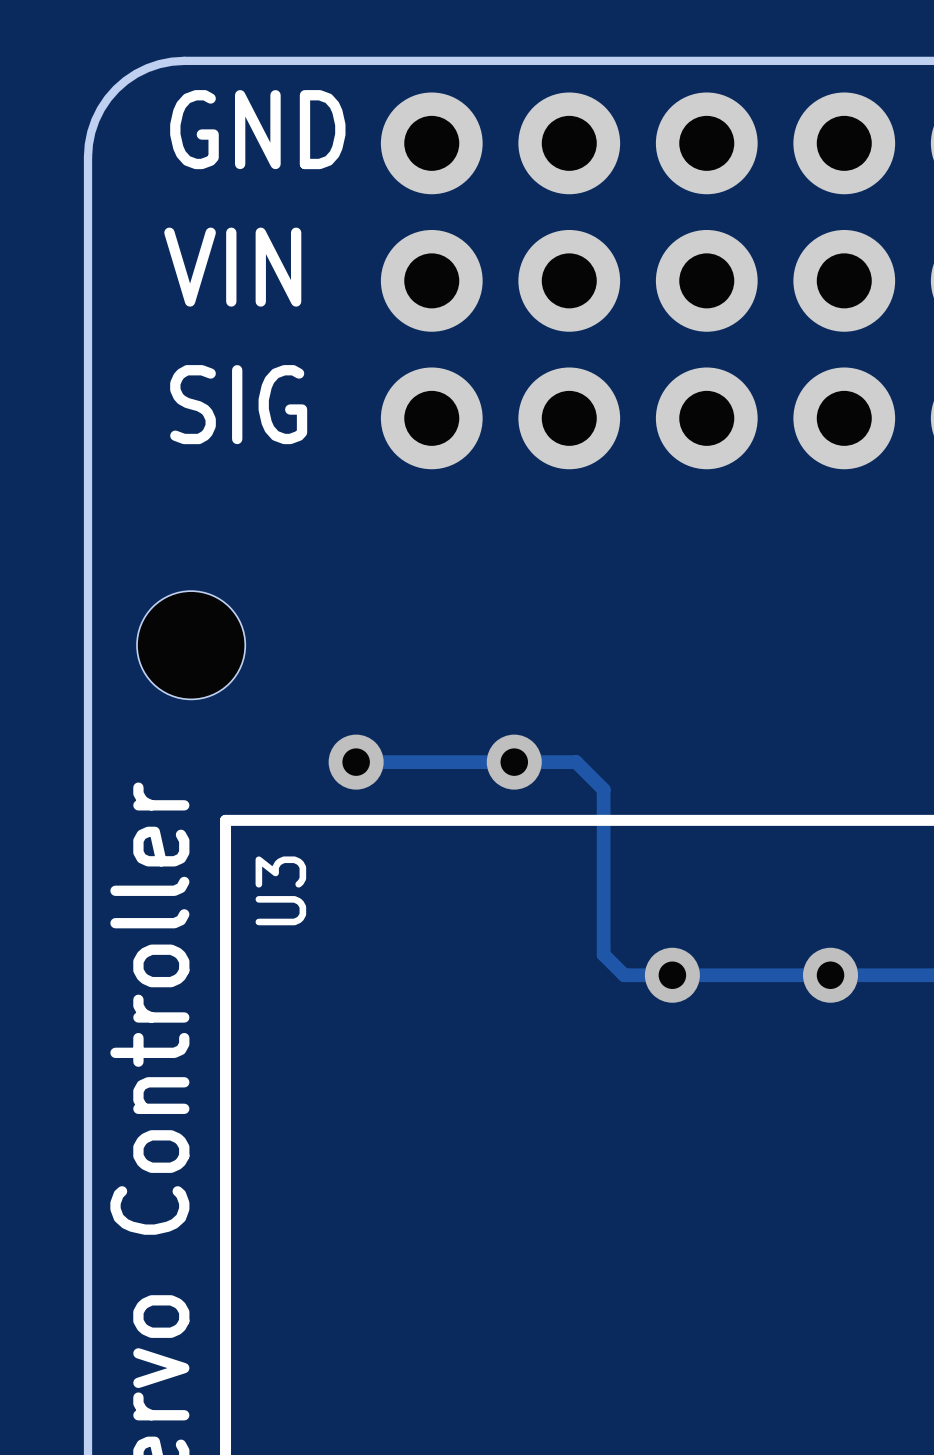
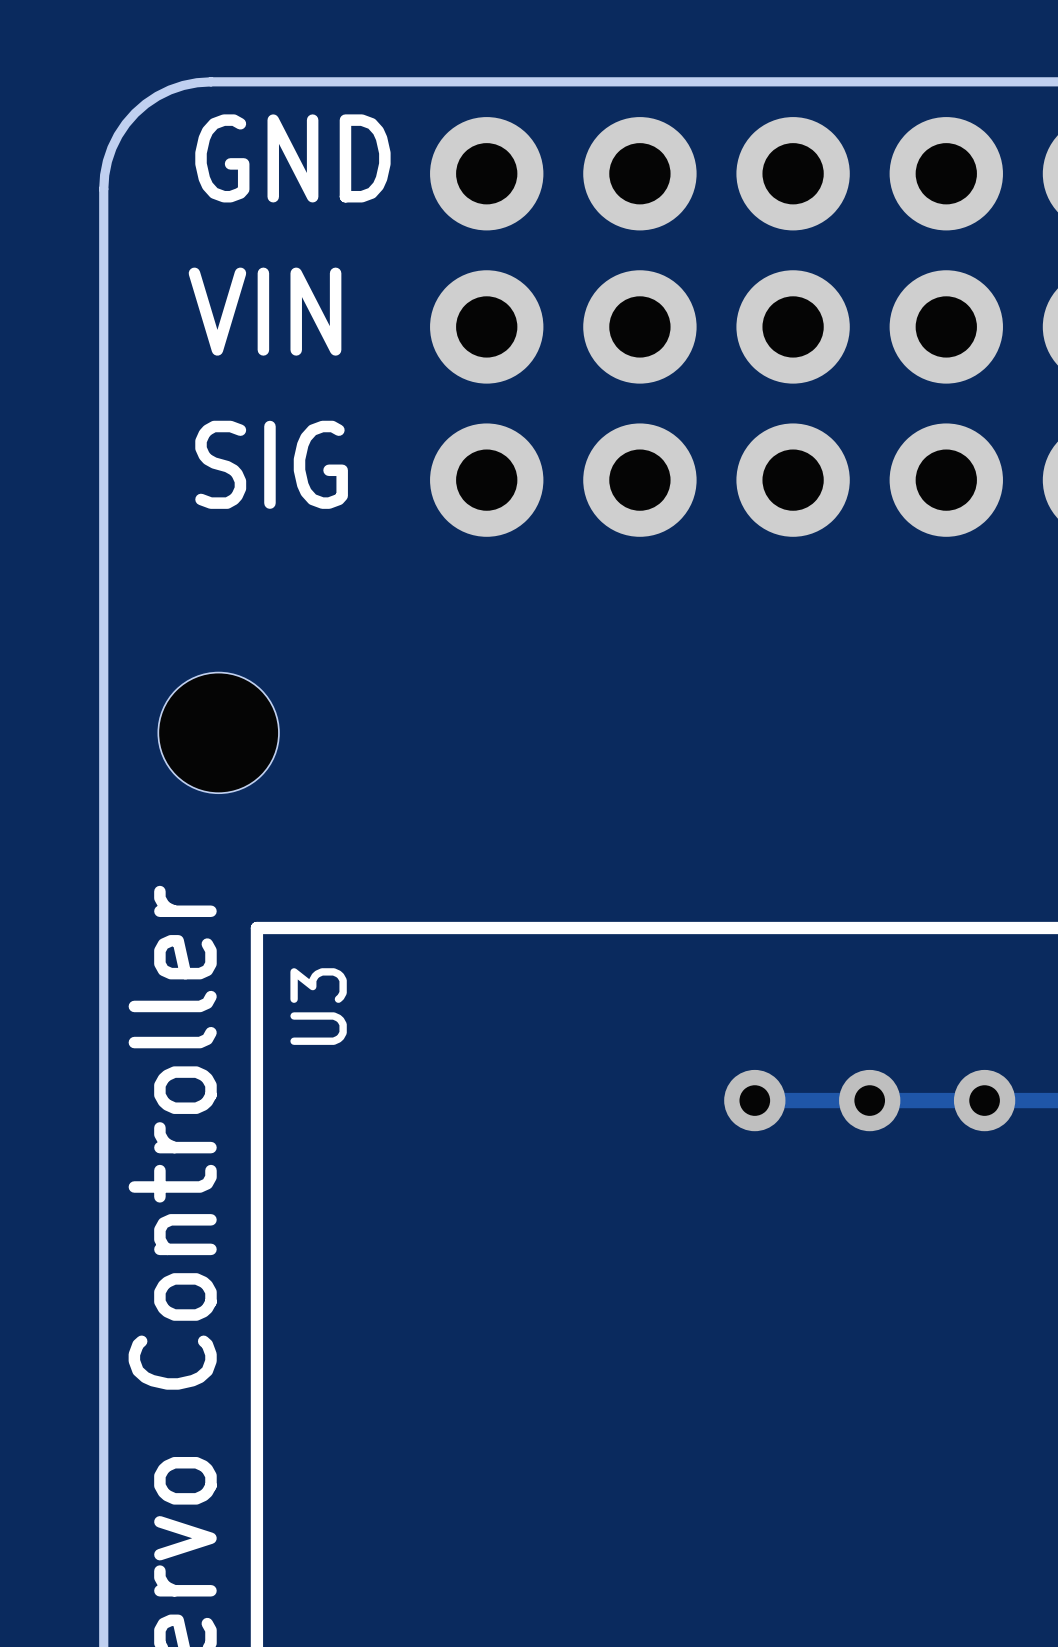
track: (356, 762) (576, 762) (603, 789) (603, 954) (624, 975) (672, 975) -> none
via: (356, 762) -> none
via: (514, 762) -> none
via: none -> (869, 1100)
via position: (830, 975) -> (984, 1100)

